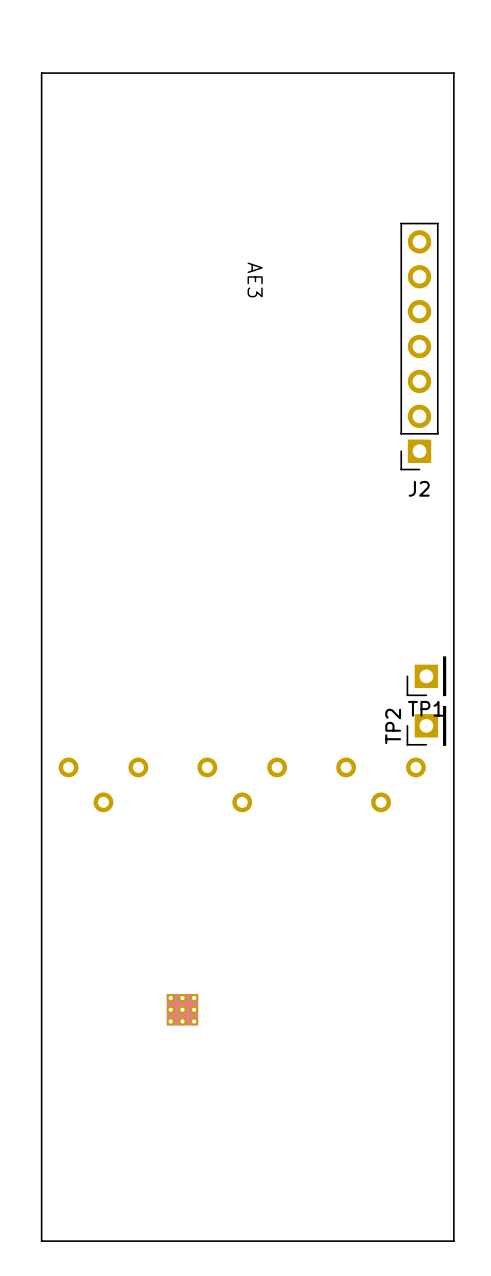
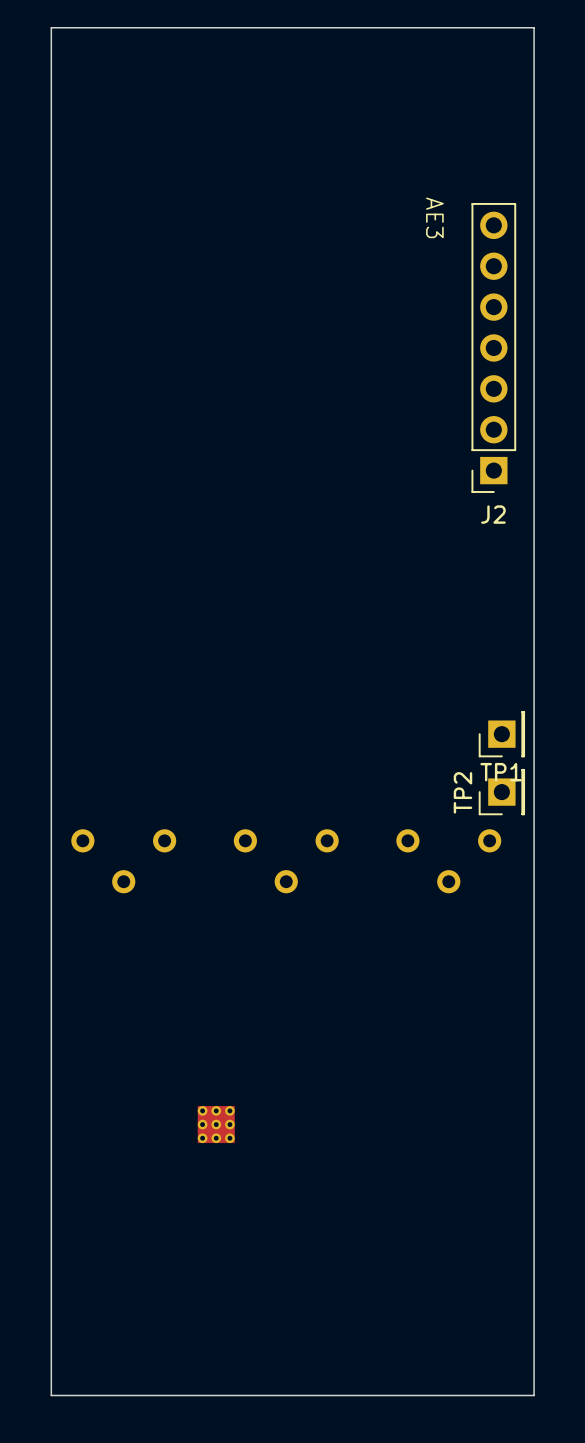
AE3 position: (255, 279) -> (434, 217)

